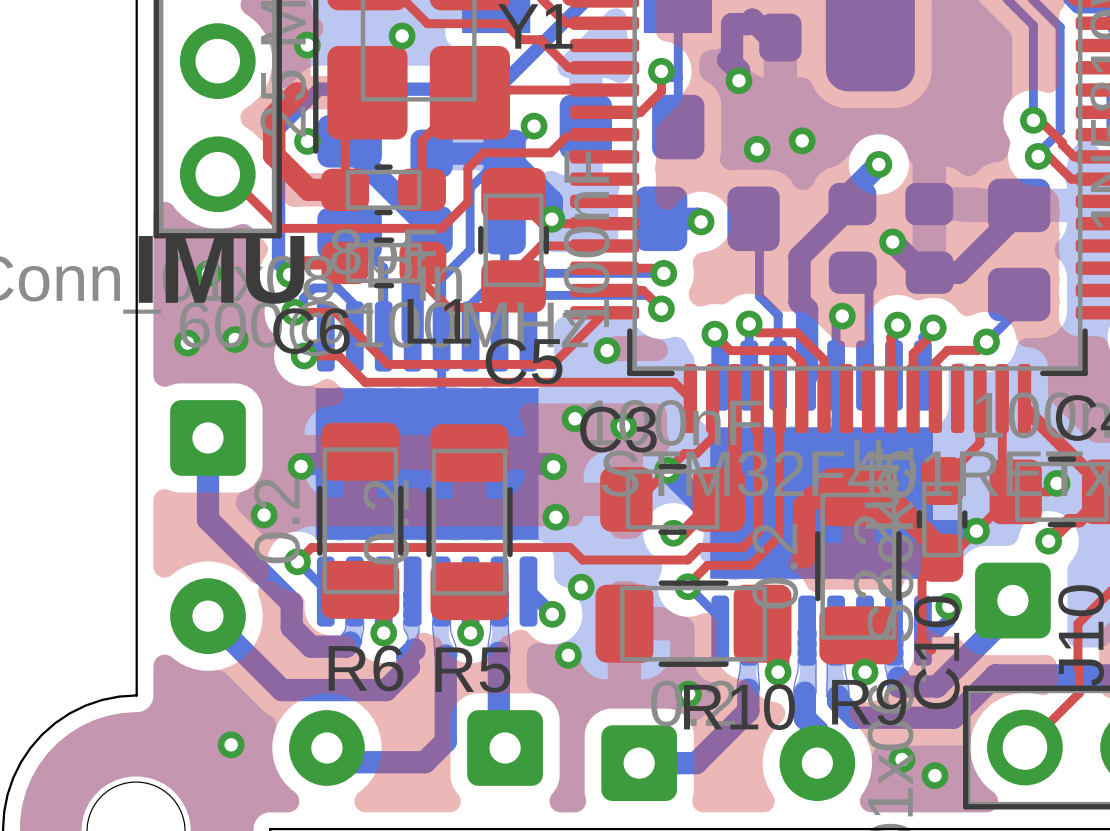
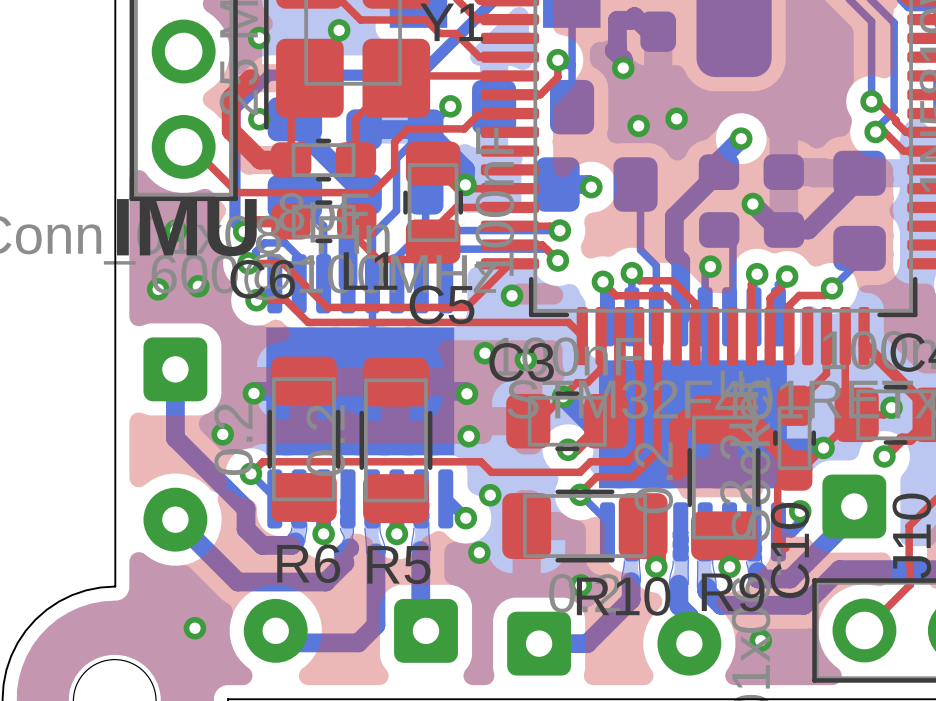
via: (934, 775) -> none

